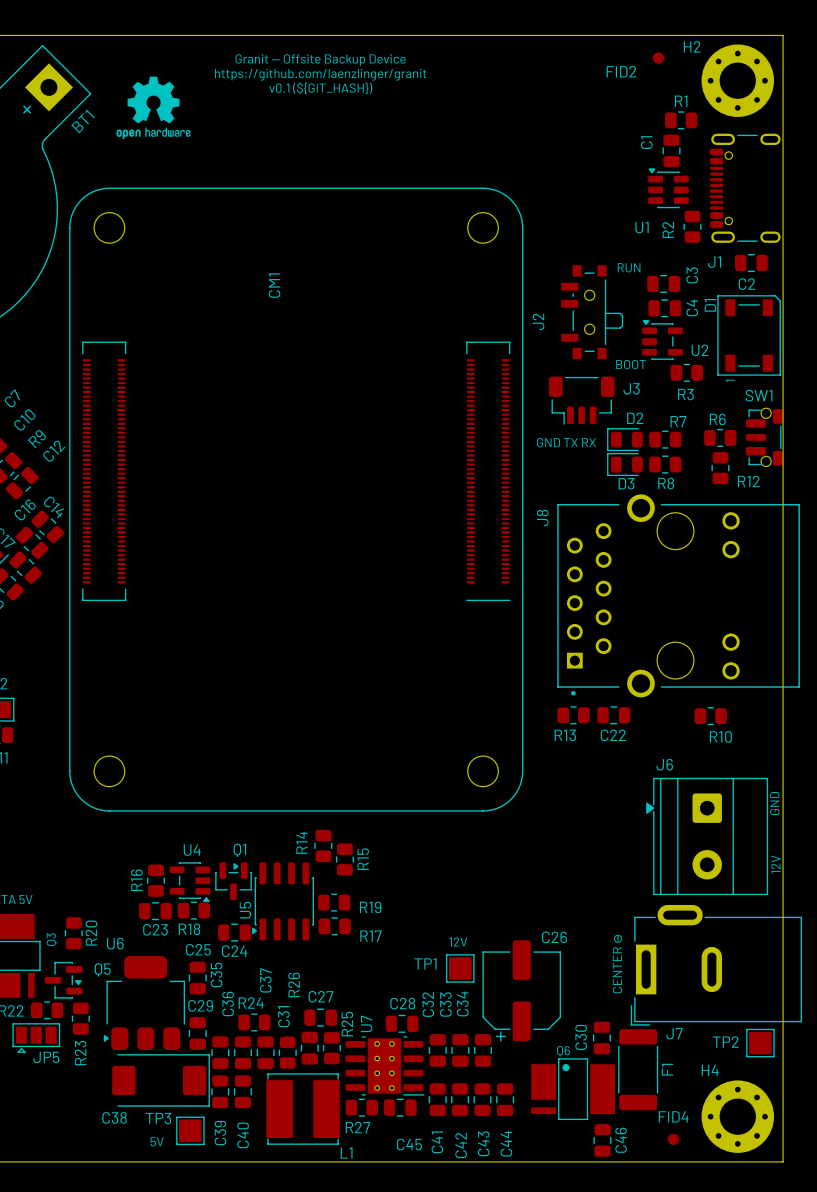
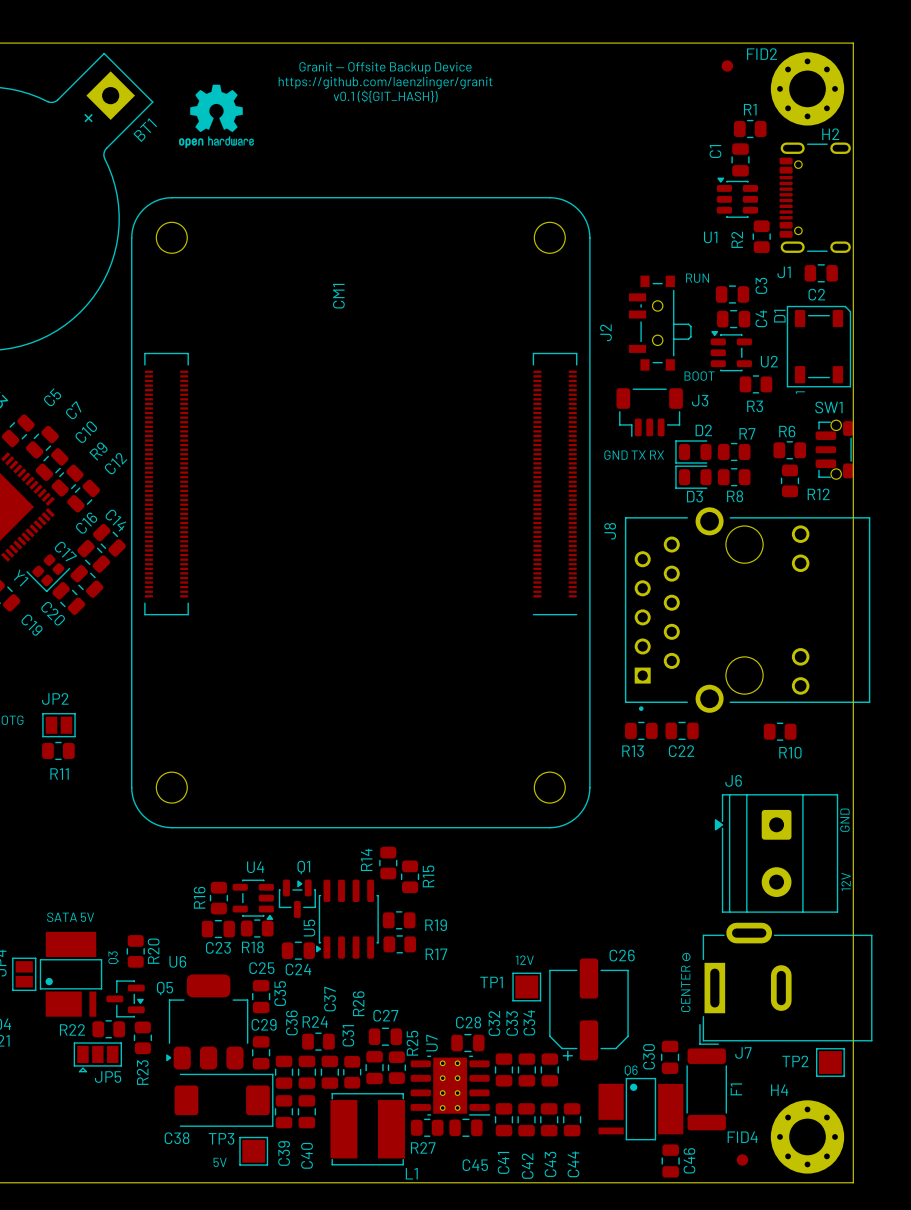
H2 name position: H2 (692, 46) -> H2 (830, 134)
FID2 name position: FID2 (621, 71) -> FID2 (761, 54)

